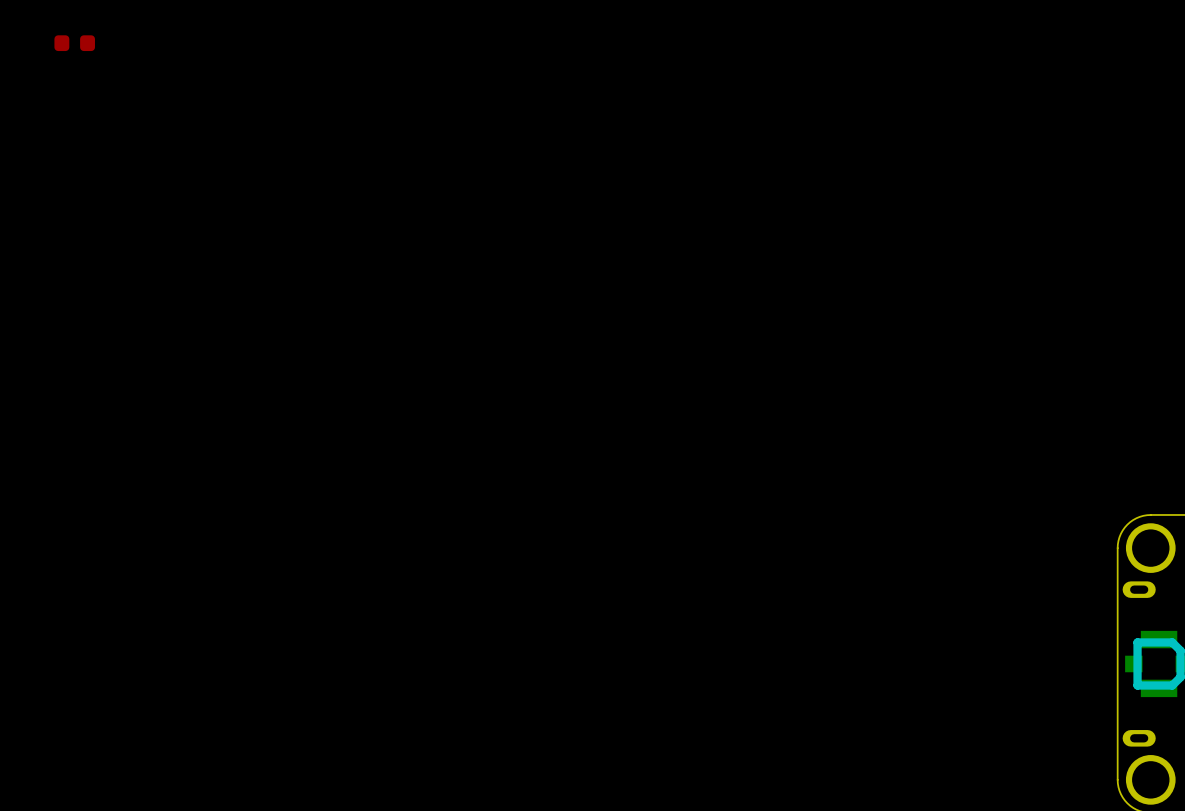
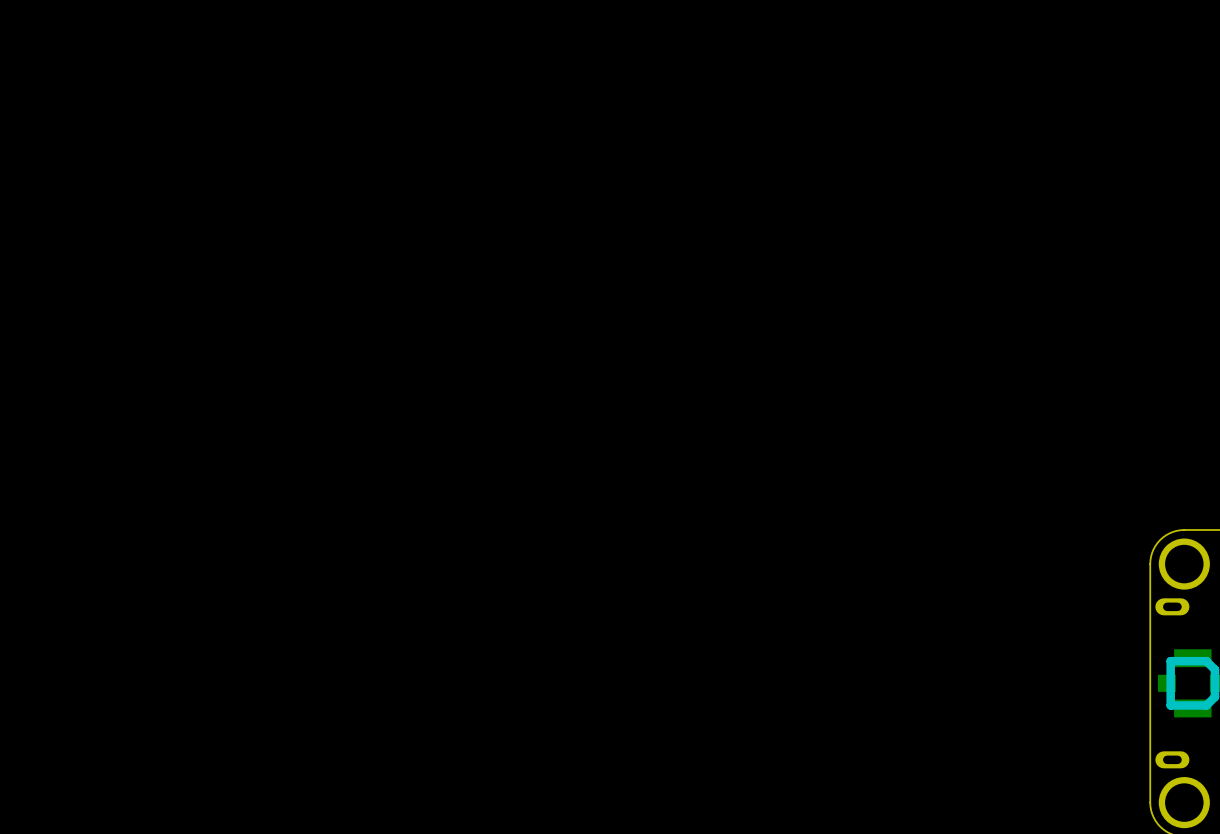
part: (74, 43) -> none

